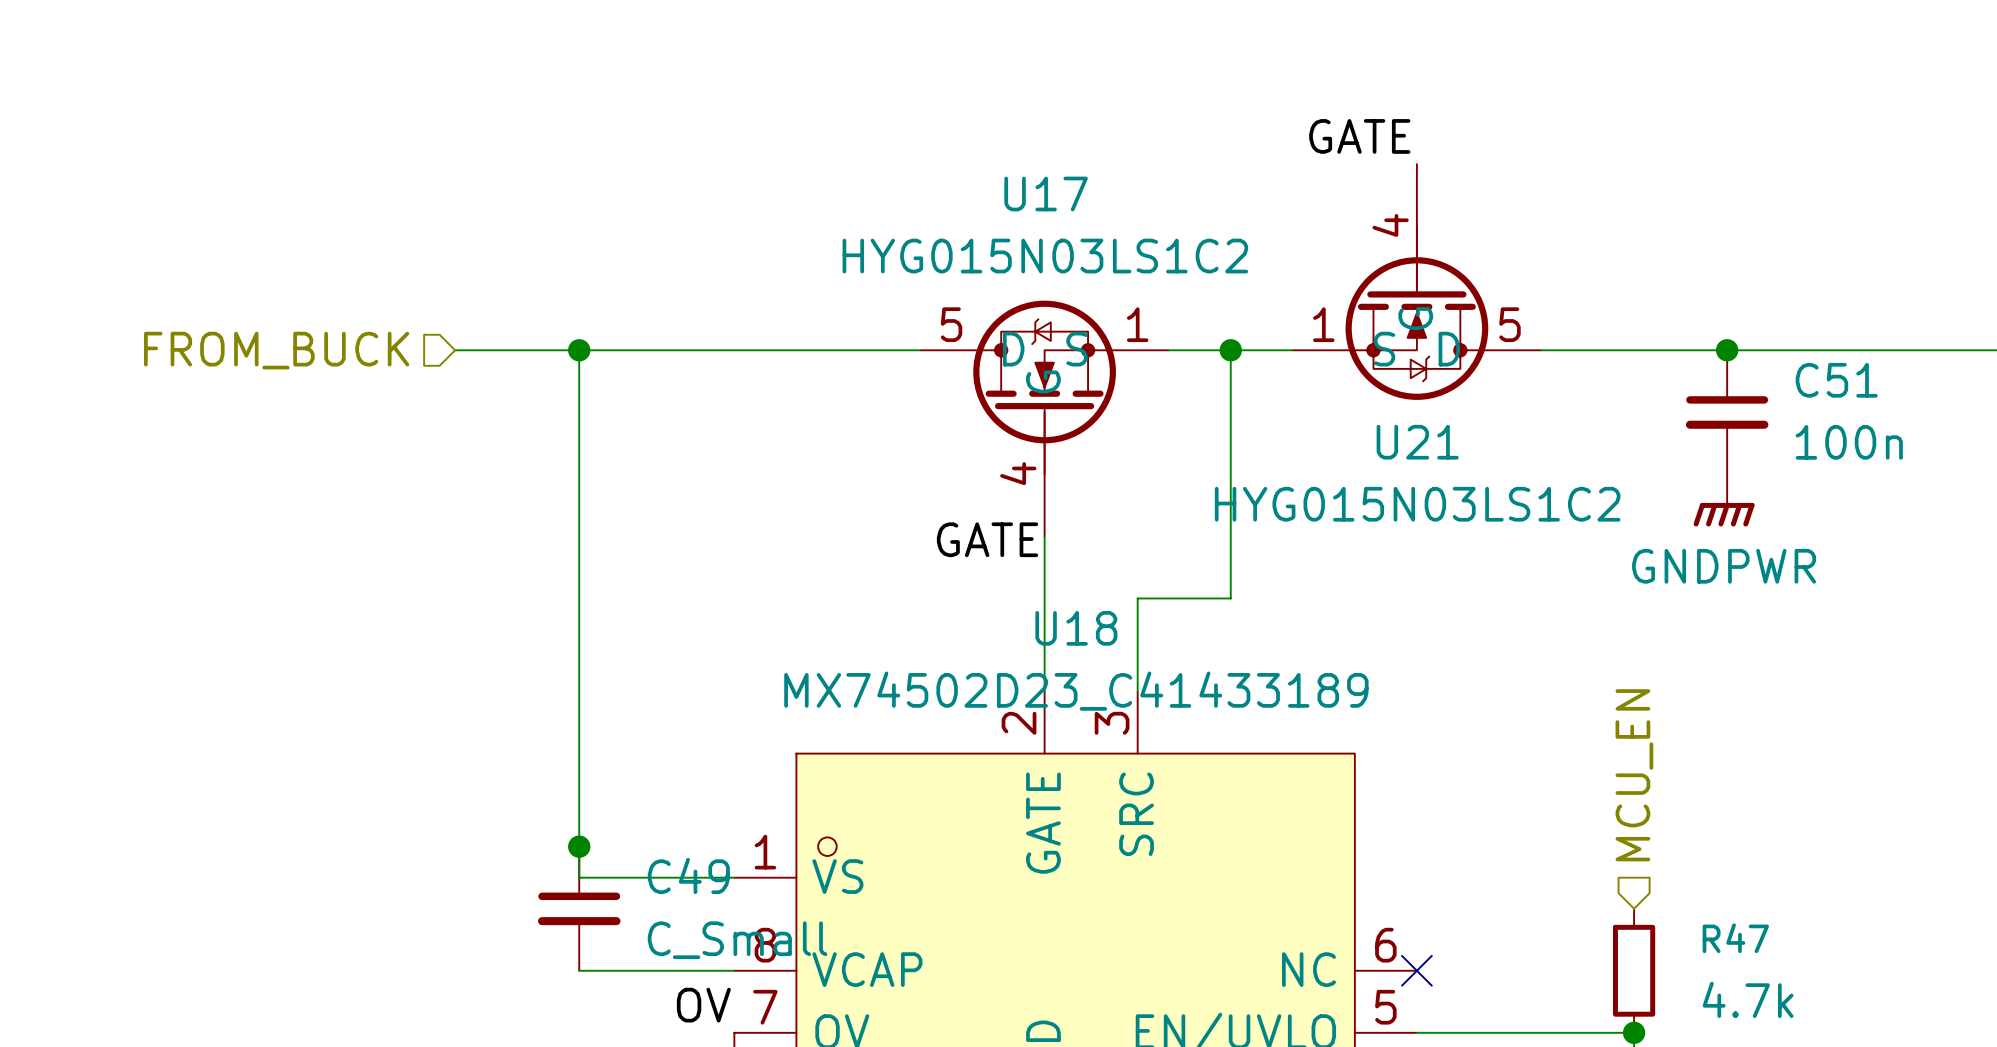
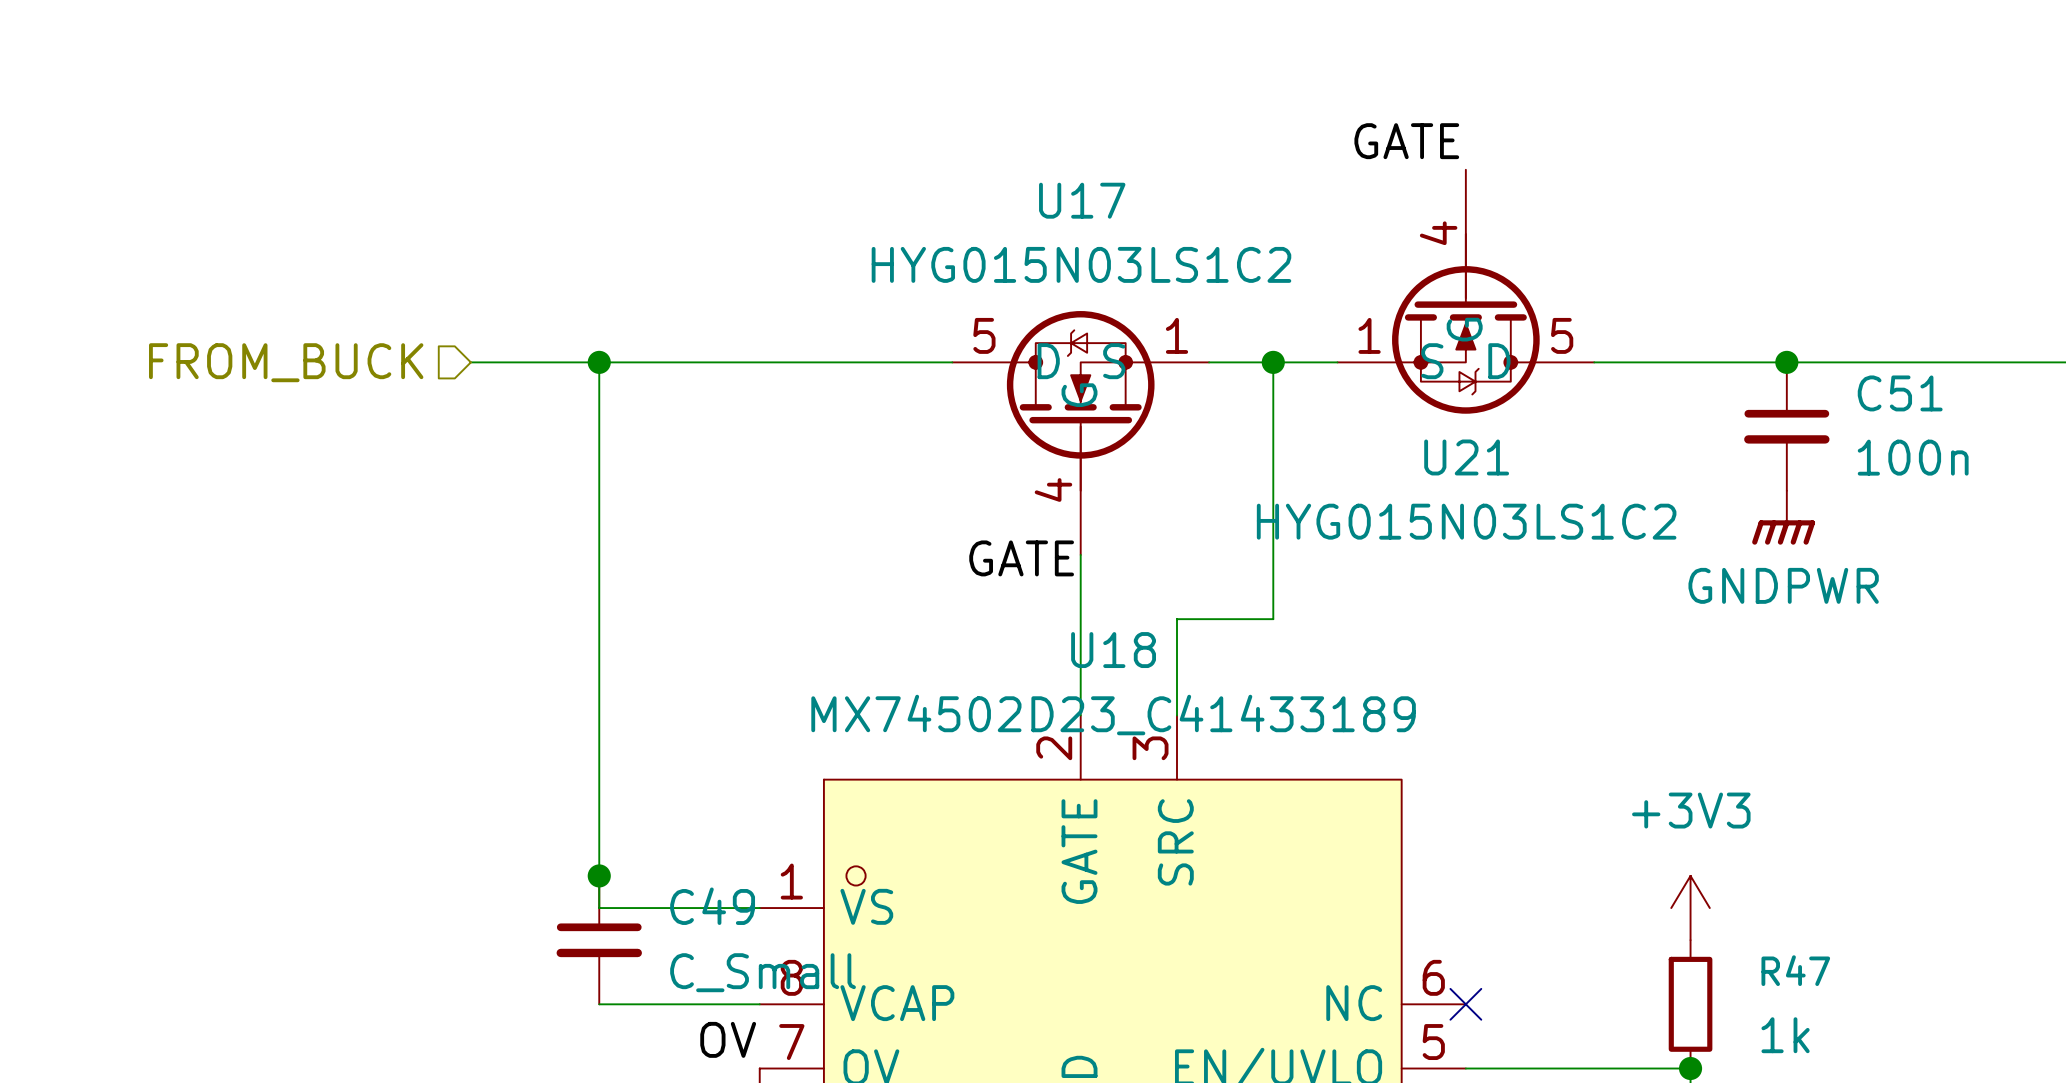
hierarchical label: MCU_EN (1634, 775) -> none
power symbol: none -> +3V3 (1690, 908)
R47 value: 4.7k (1748, 999) -> 1k (1785, 1035)

